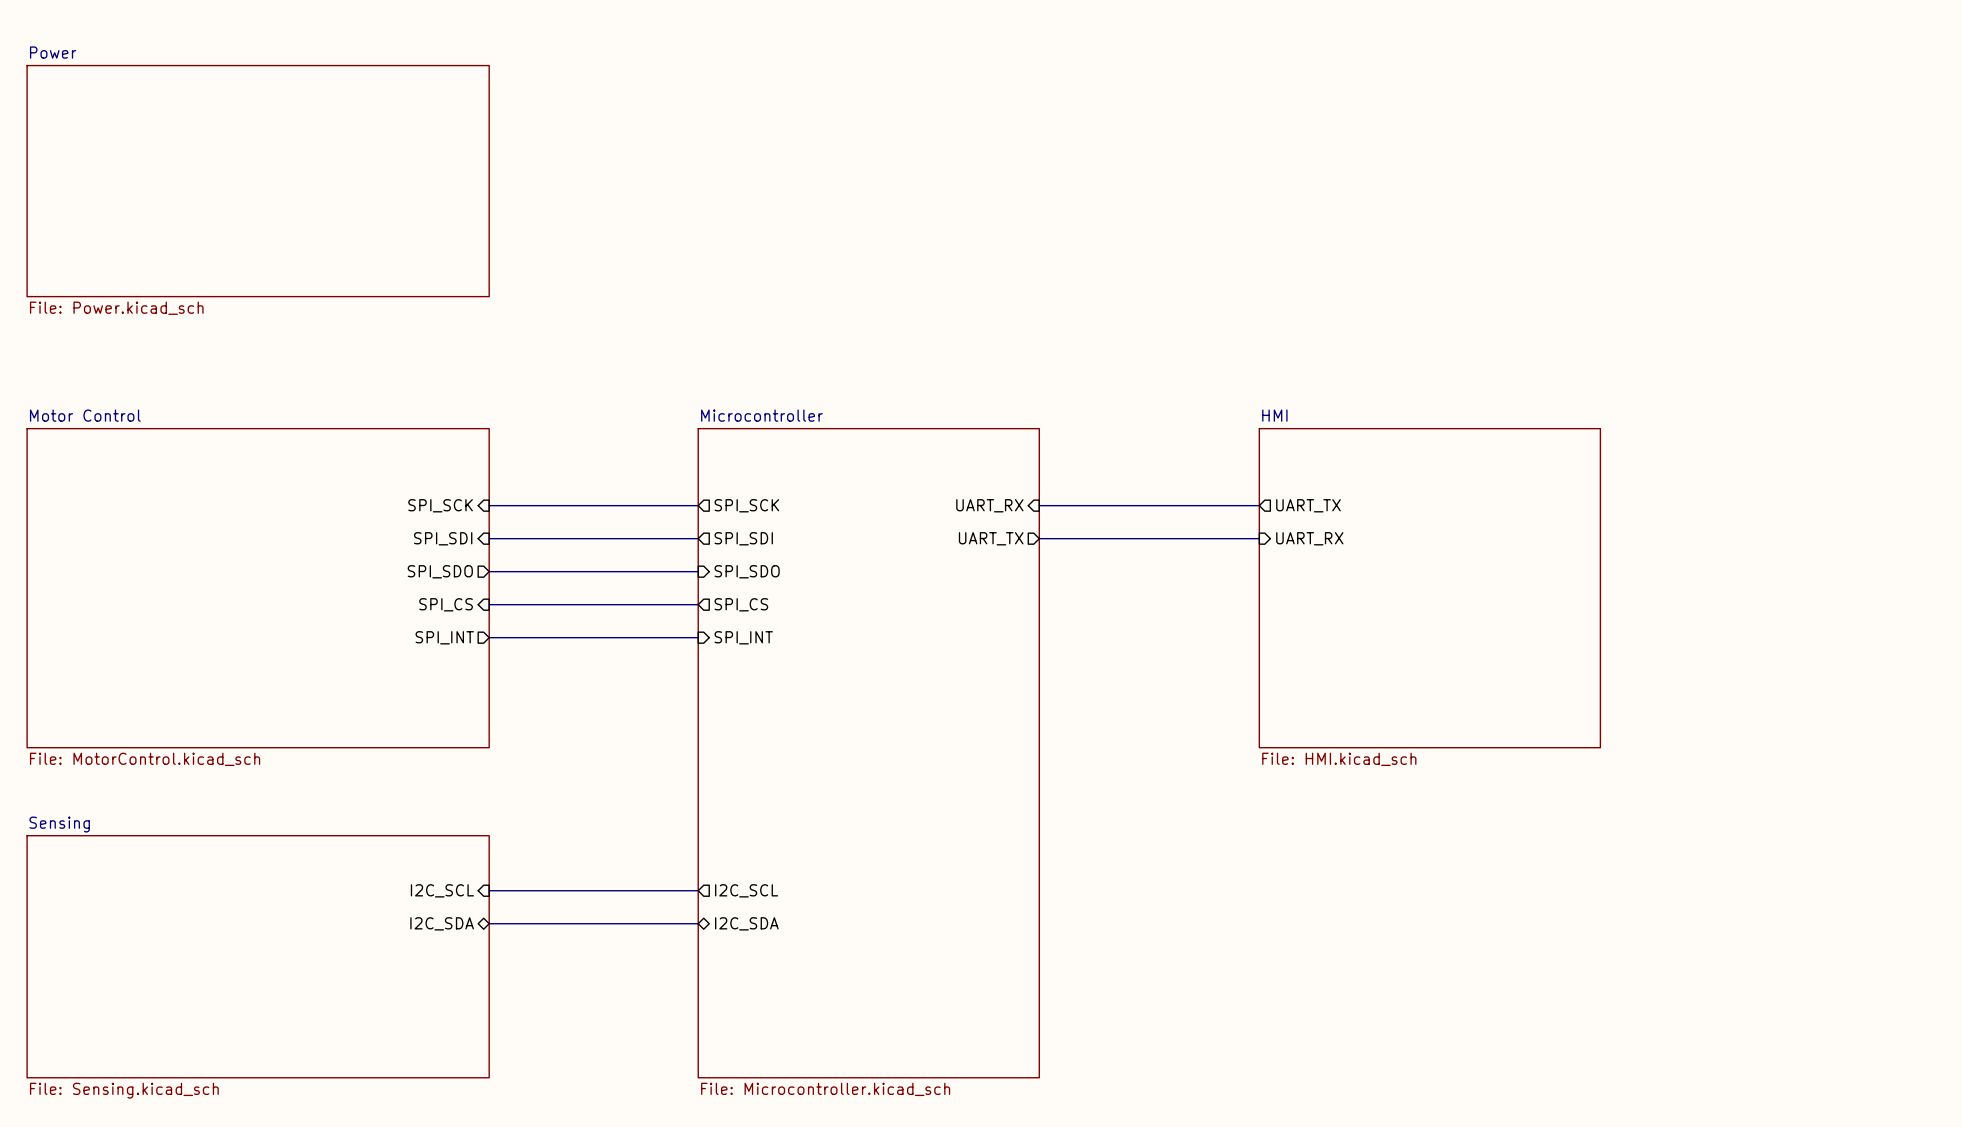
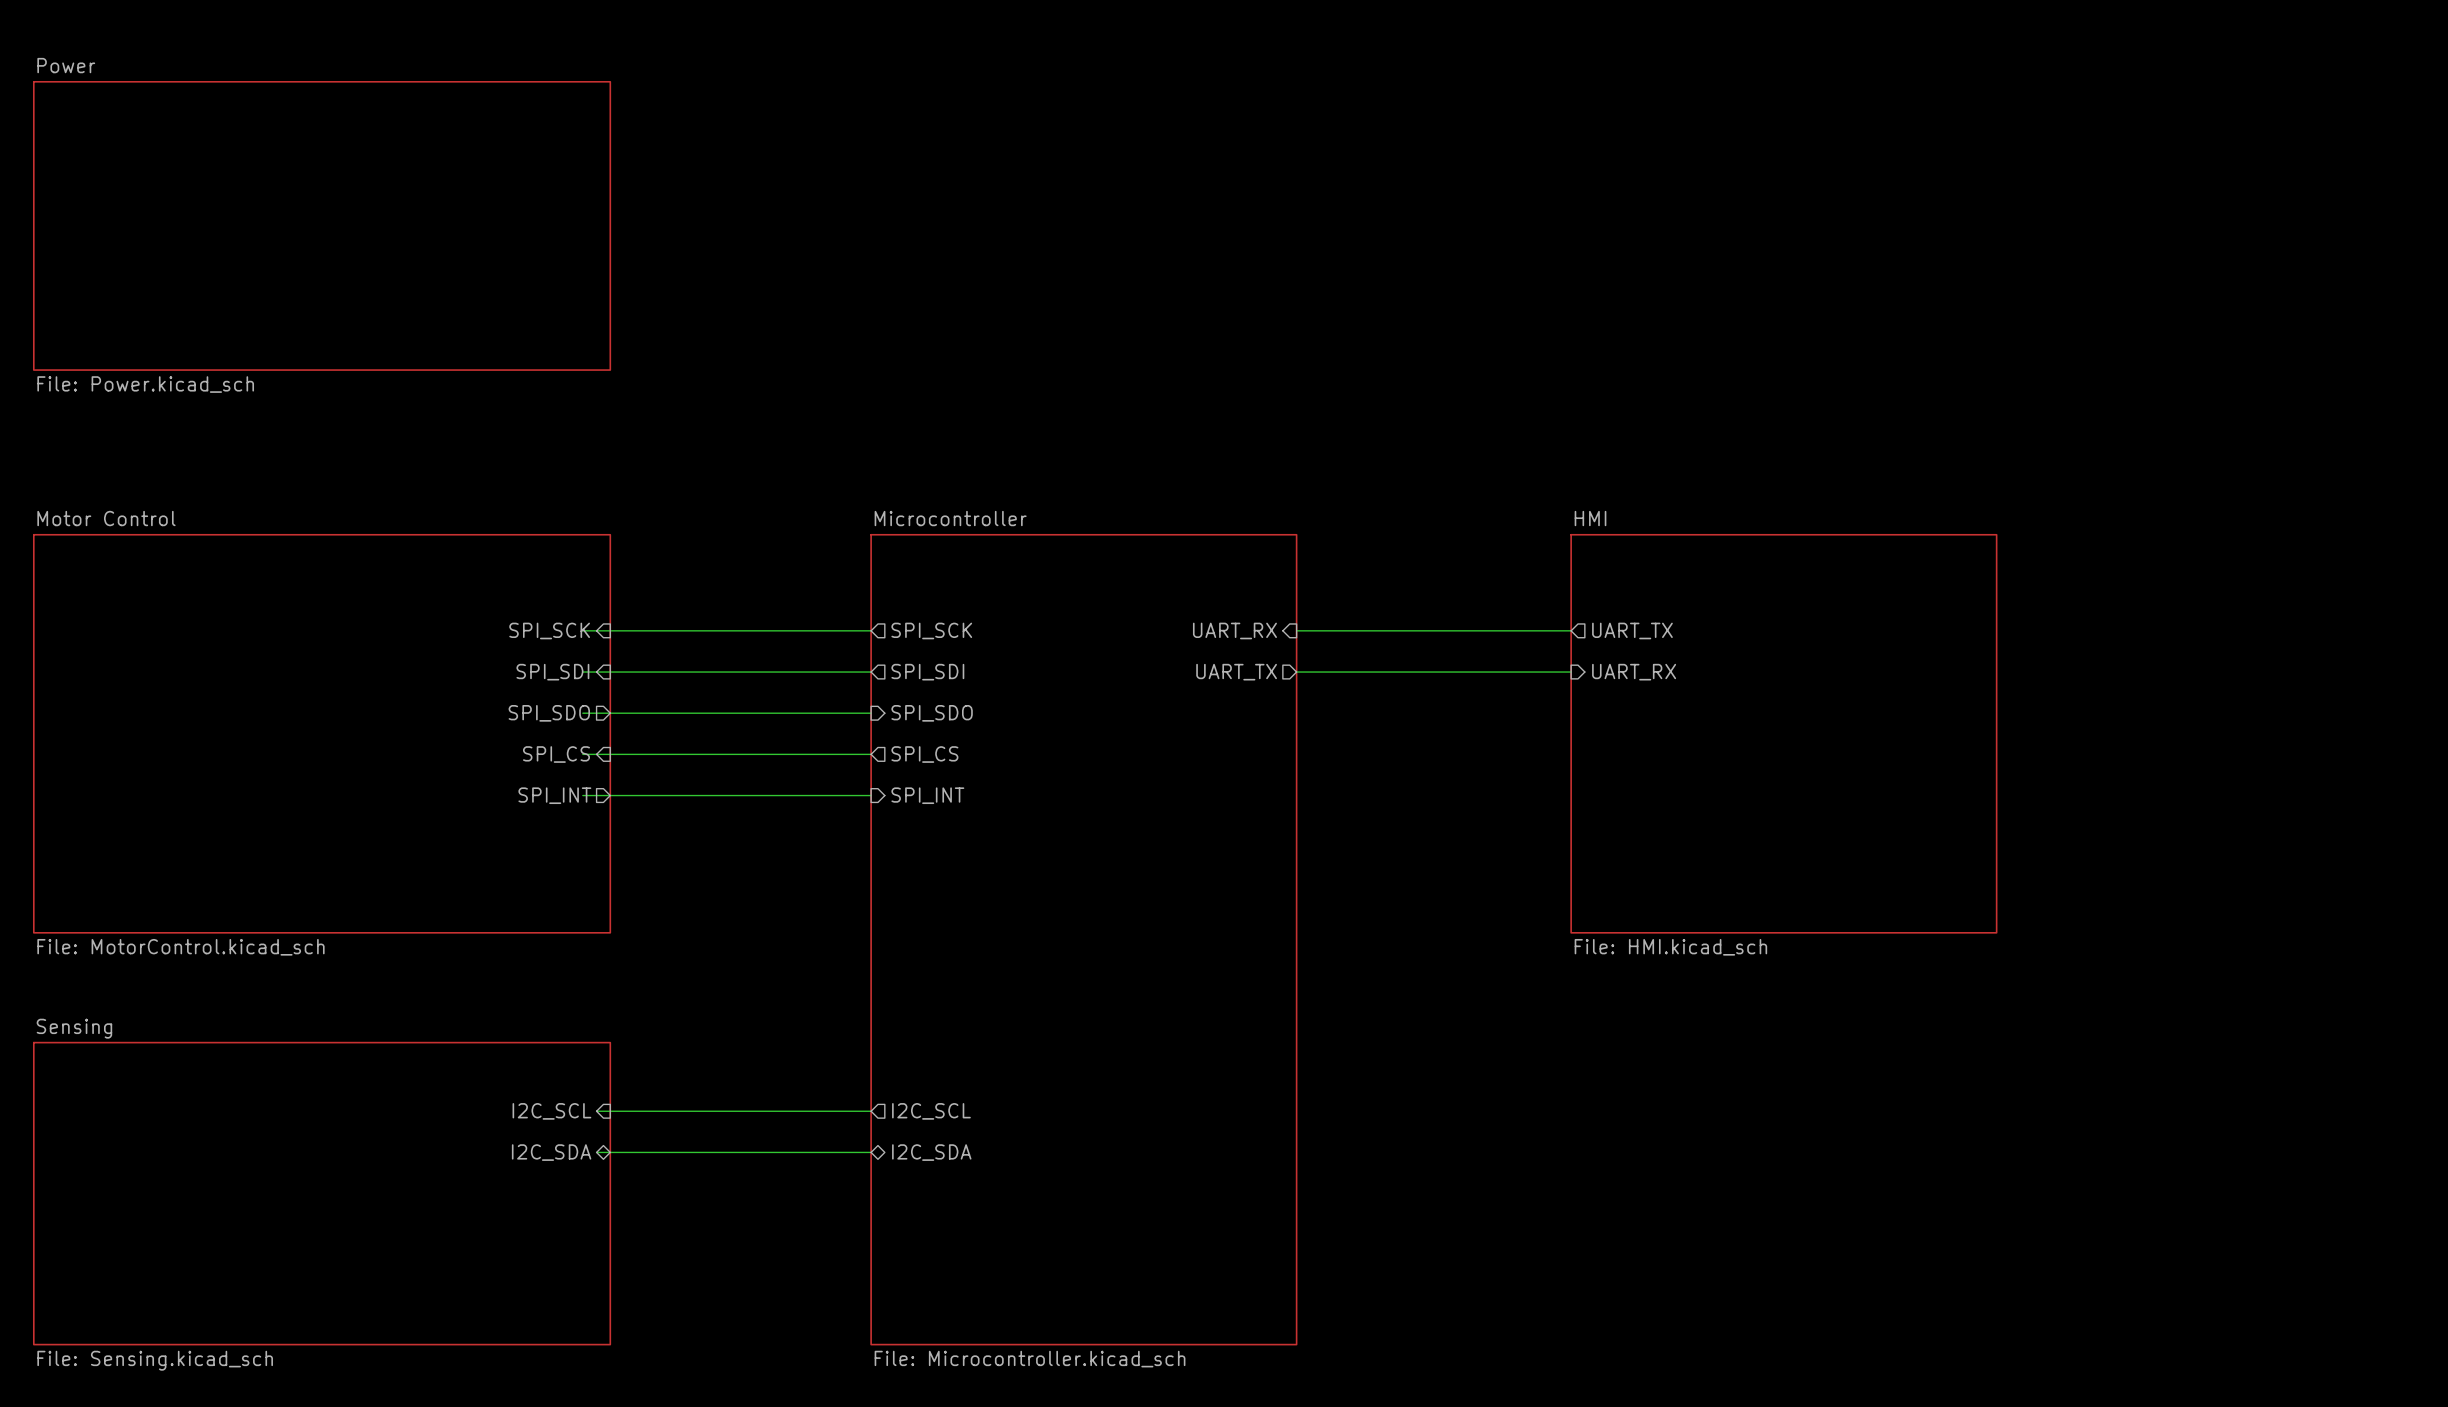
wire: none -> (582, 630) (610, 630)
wire: none -> (582, 672) (610, 672)
wire: none -> (582, 713) (610, 713)
wire: none -> (582, 754) (610, 754)
wire: none -> (582, 795) (610, 795)
wire: none -> (596, 1111) (610, 1111)
wire: none -> (596, 1152) (610, 1152)

